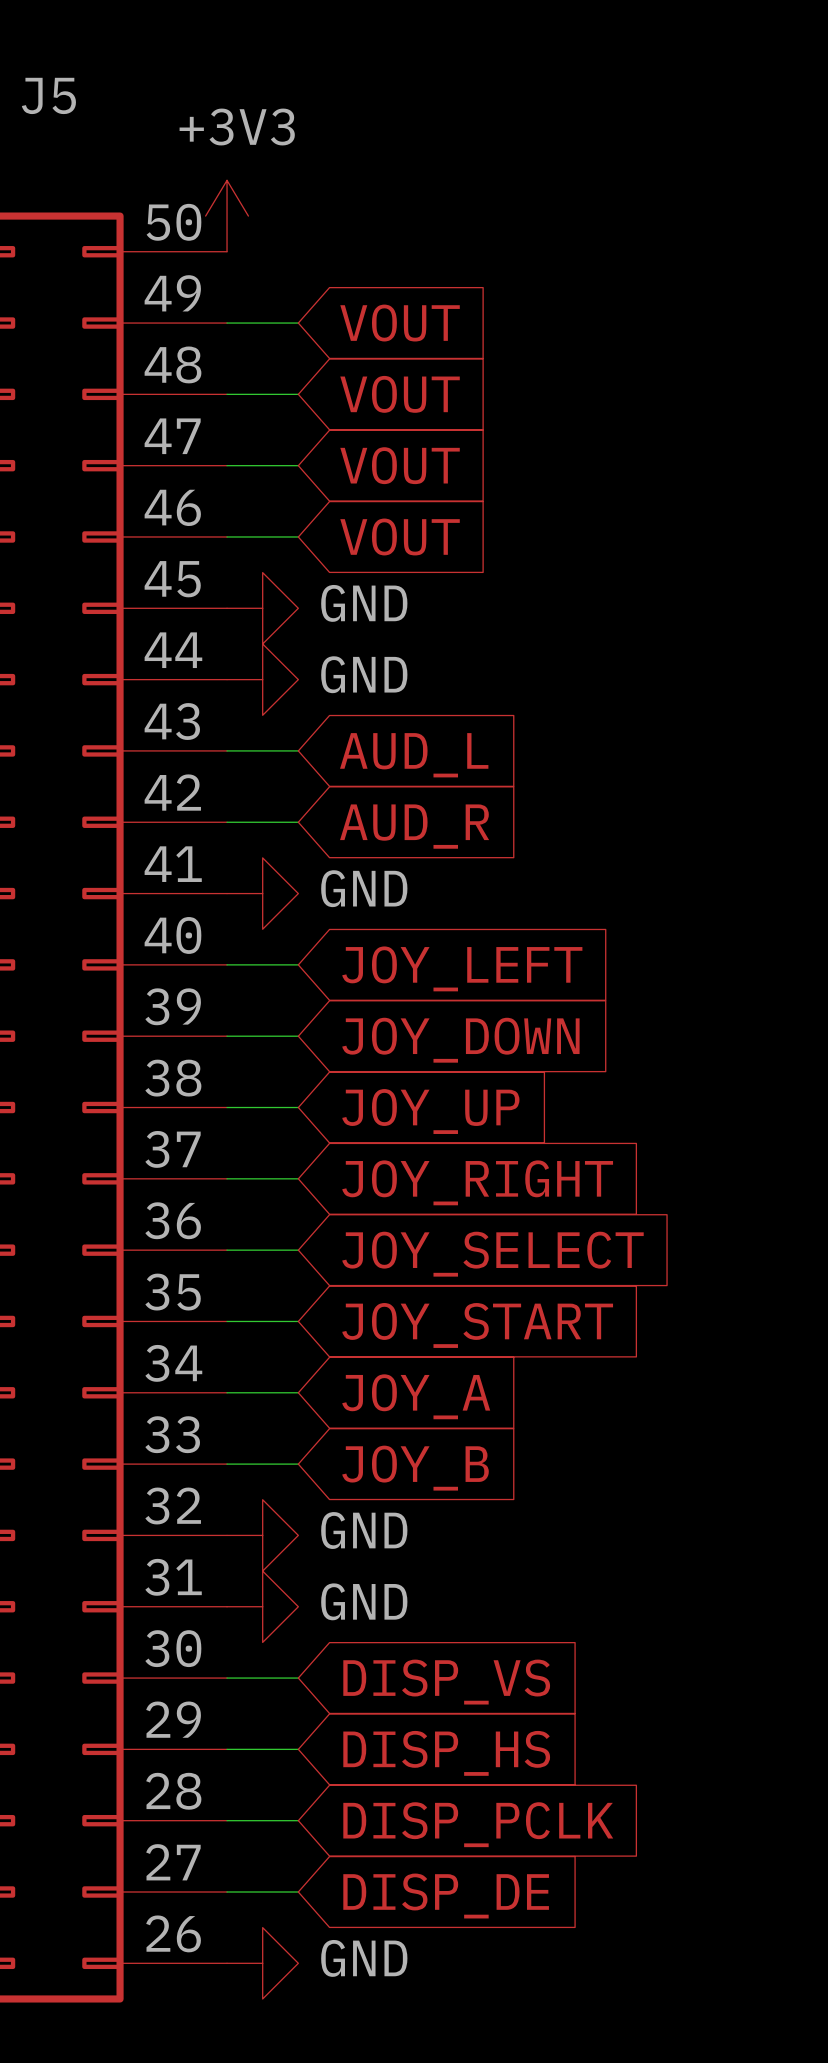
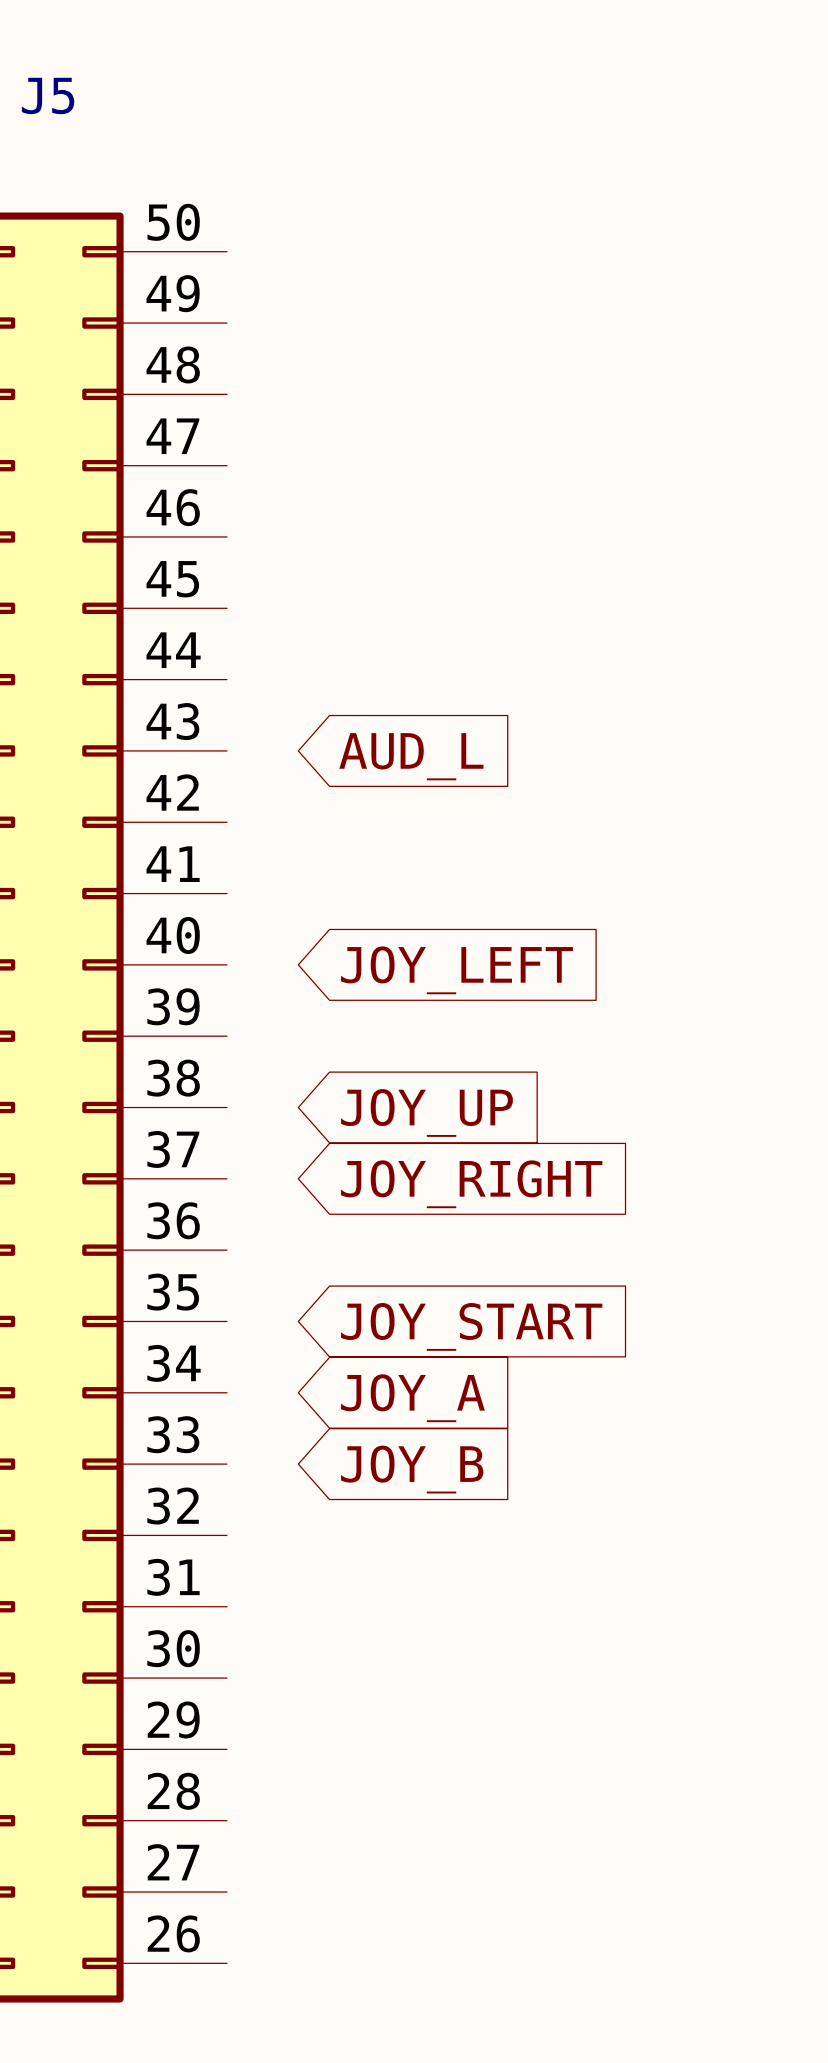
power symbol: +3V3 (227, 216) -> none
wire: (227, 323) (298, 323) -> none
global label: VOUT (400, 323) -> none
wire: (227, 394) (298, 394) -> none
global label: VOUT (400, 394) -> none
wire: (227, 465) (298, 465) -> none
global label: VOUT (400, 465) -> none
wire: (227, 536) (298, 536) -> none
global label: VOUT (400, 536) -> none
power symbol: GND (262, 608) -> none
power symbol: GND (262, 679) -> none
wire: (227, 750) (298, 750) -> none
wire: (227, 822) (298, 822) -> none
global label: AUD_R (414, 826) -> none
power symbol: GND (262, 893) -> none
wire: (227, 964) (298, 964) -> none
wire: (227, 1036) (298, 1036) -> none
global label: JOY_DOWN (460, 1040) -> none
wire: (227, 1107) (298, 1107) -> none
wire: (227, 1178) (298, 1178) -> none
wire: (227, 1250) (298, 1250) -> none
global label: JOY_SELECT (492, 1254) -> none
wire: (227, 1321) (298, 1321) -> none
wire: (227, 1392) (298, 1392) -> none
wire: (227, 1464) (298, 1464) -> none
power symbol: GND (262, 1535) -> none
power symbol: GND (262, 1606) -> none
wire: (227, 1678) (298, 1678) -> none
global label: DISP_VS (446, 1682) -> none
wire: (227, 1749) (298, 1749) -> none
global label: DISP_HS (446, 1753) -> none
wire: (227, 1820) (298, 1820) -> none
global label: DISP_PCLK (478, 1824) -> none
wire: (227, 1892) (298, 1892) -> none
global label: DISP_DE (446, 1896) -> none
power symbol: GND (262, 1963) -> none

